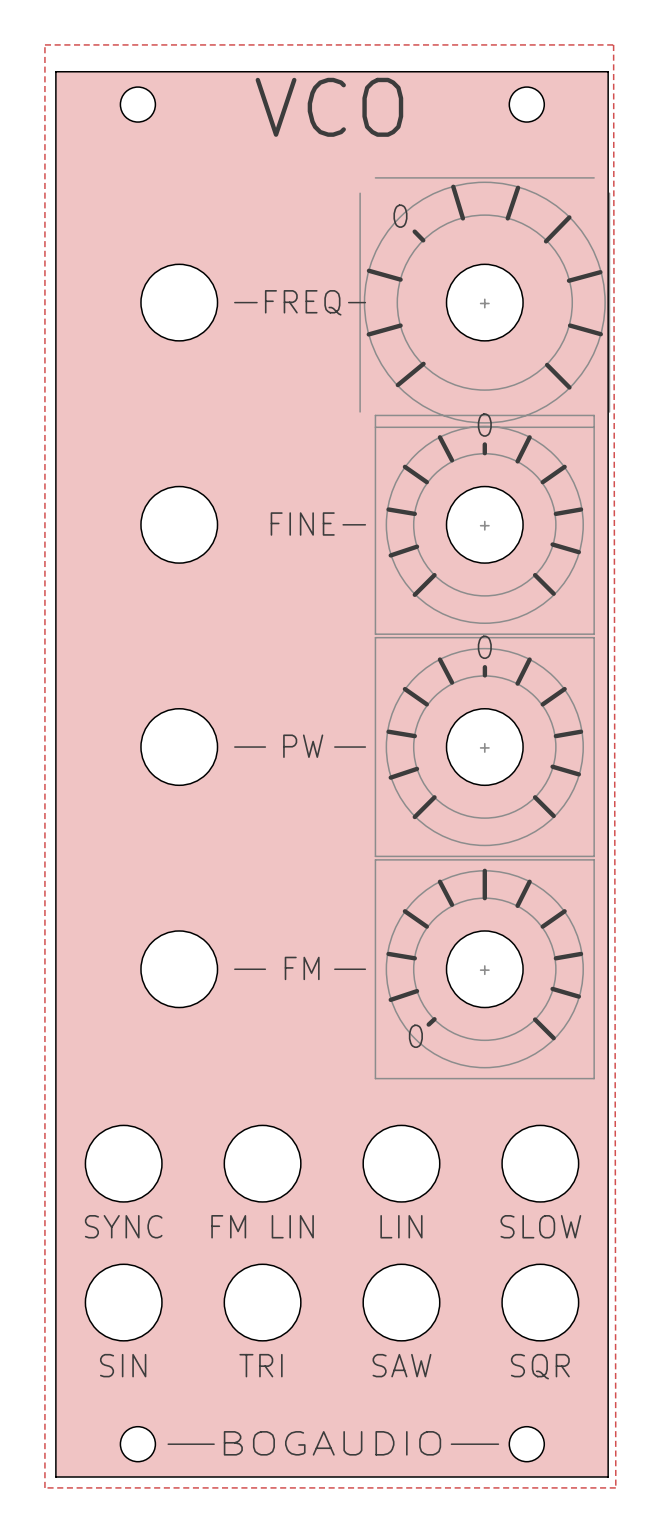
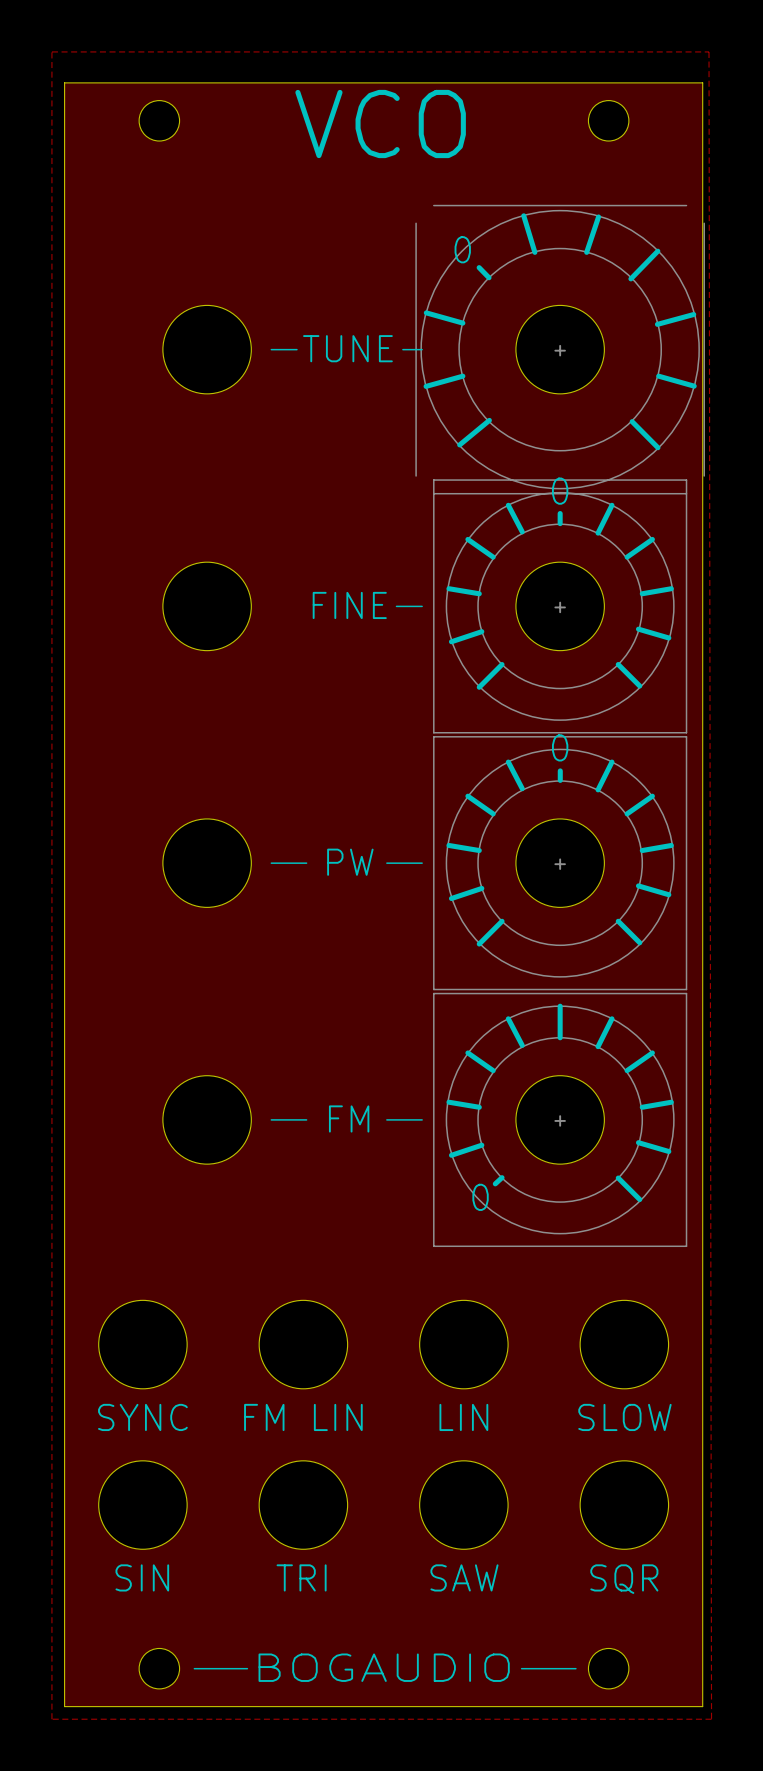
text: FREQ (303, 302) -> TUNE (347, 348)

